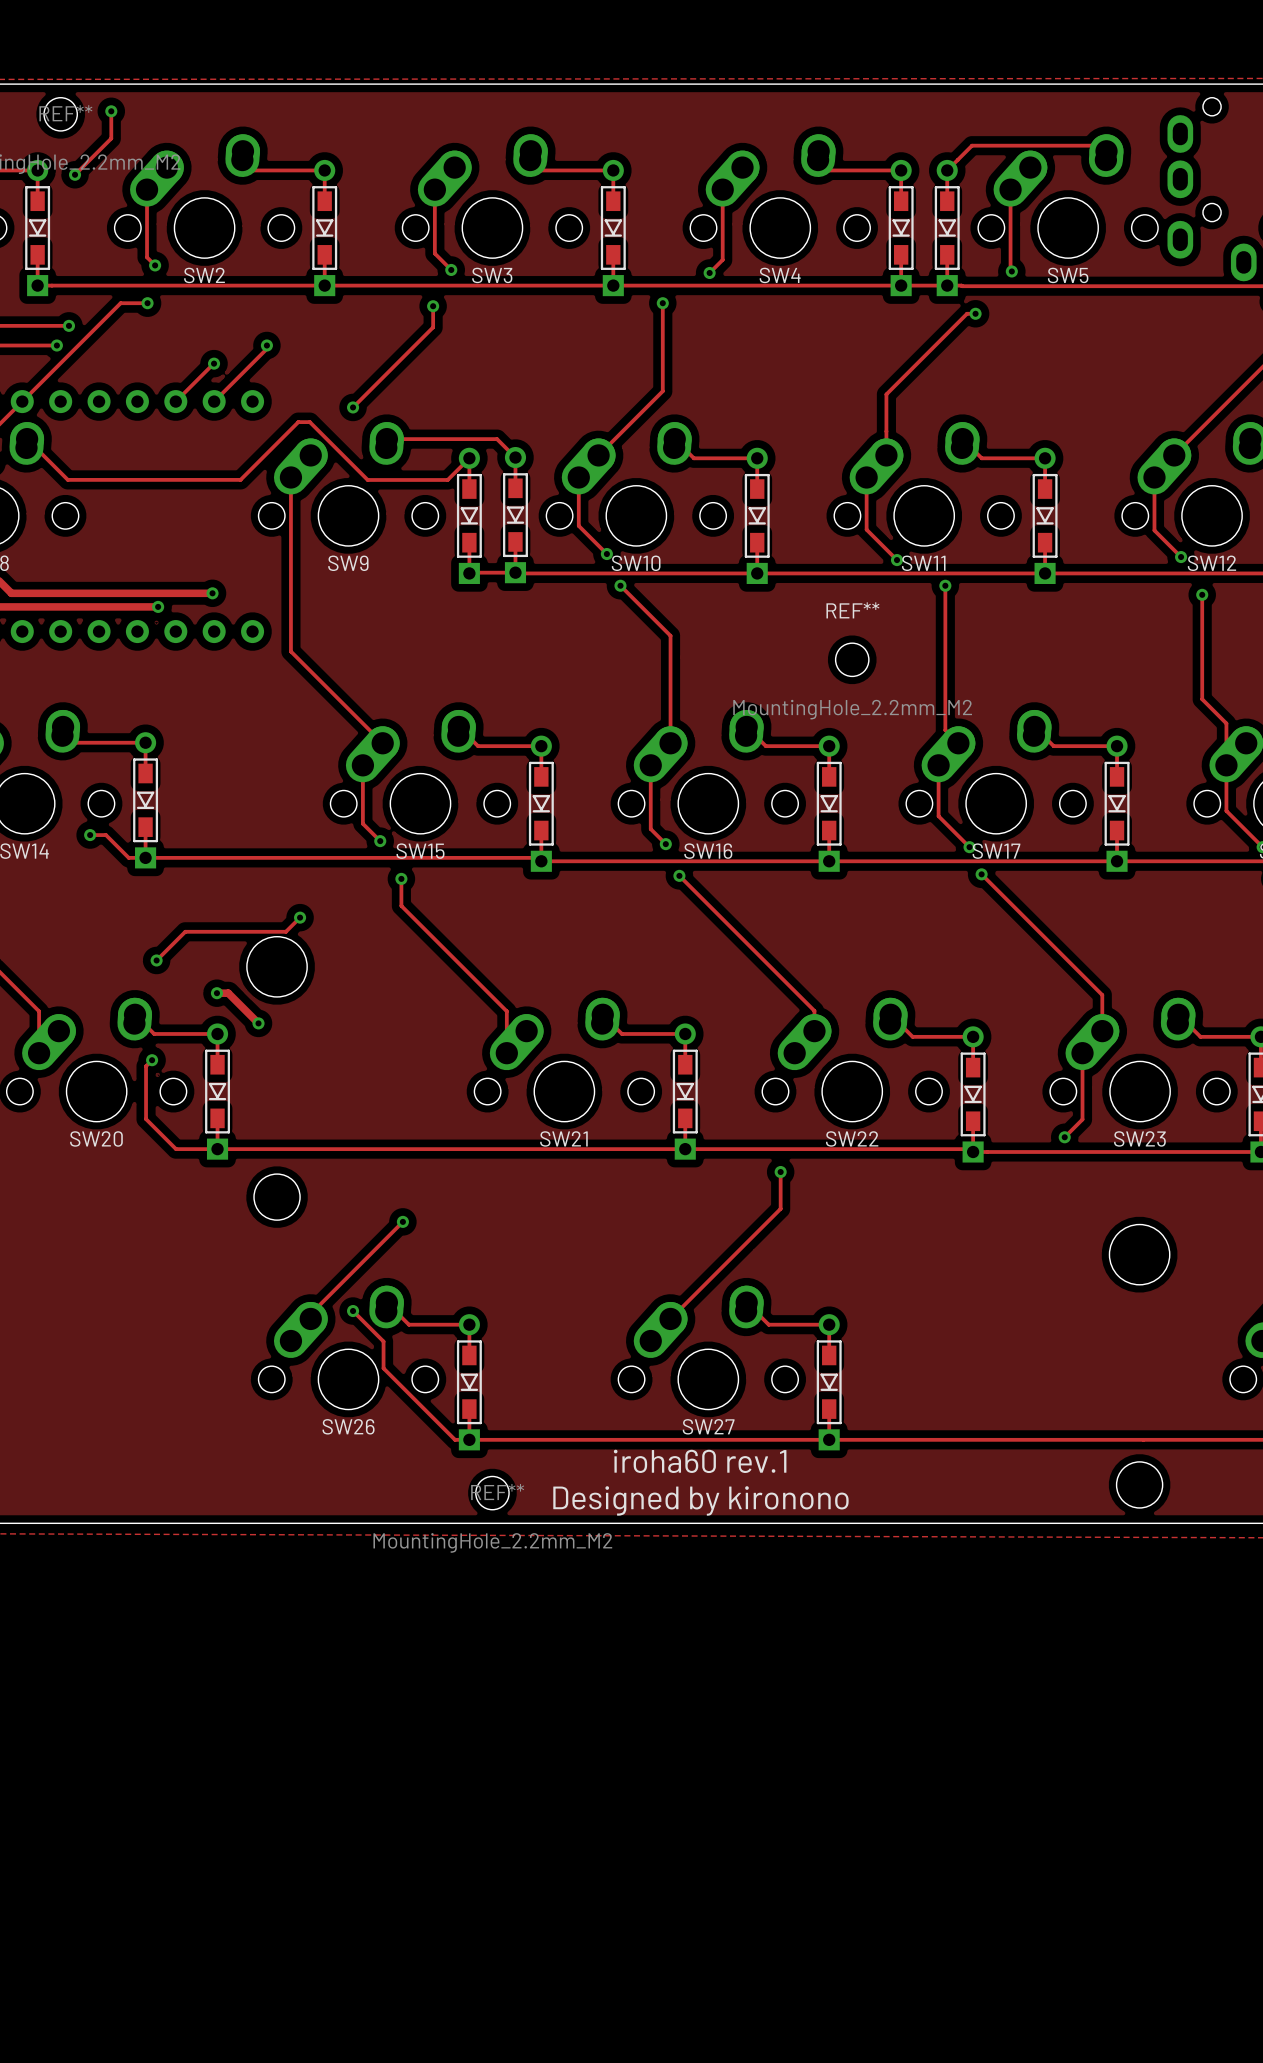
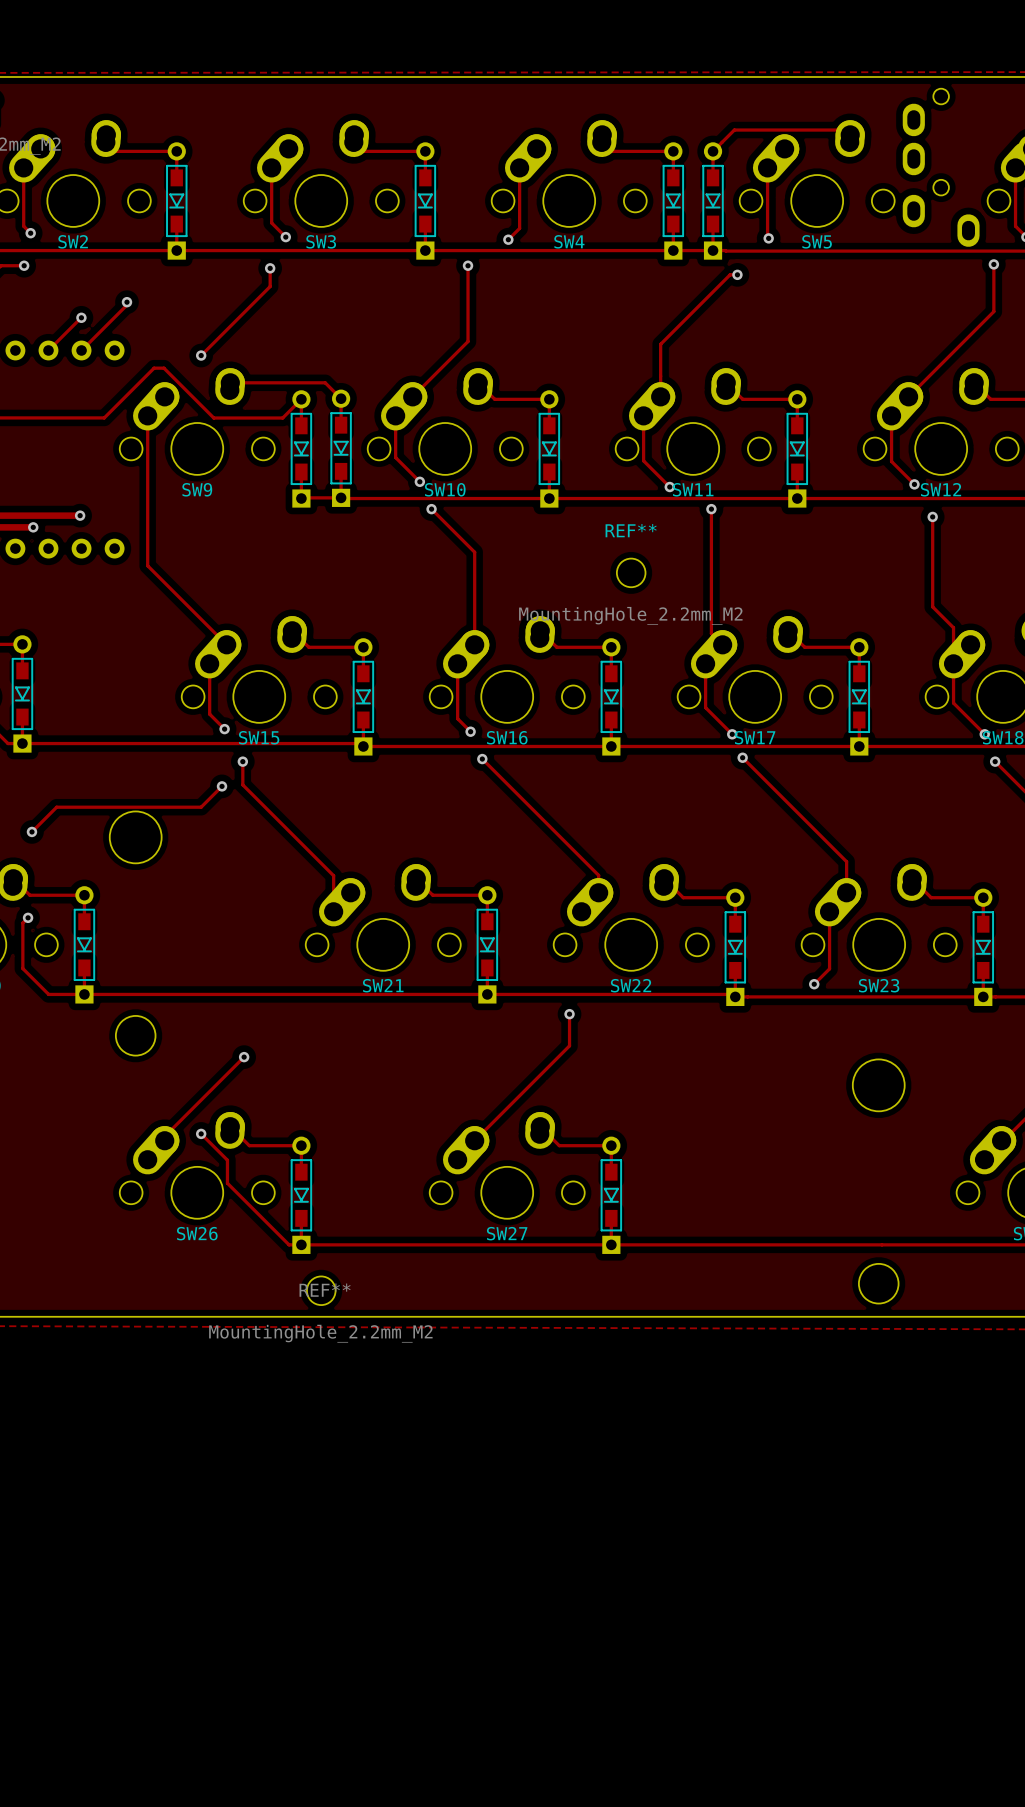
track: (300, 917) (285, 931) -> (222, 786) (201, 807) (143, 807)
via position: (300, 917) -> (222, 786)
track: (216, 993) (228, 993) (258, 1023) -> none
via: (216, 993) -> none
via: (258, 1023) -> none
text: iroha60 rev.1 (700, 1461) -> none
text: Designed by kironono (700, 1500) -> none

